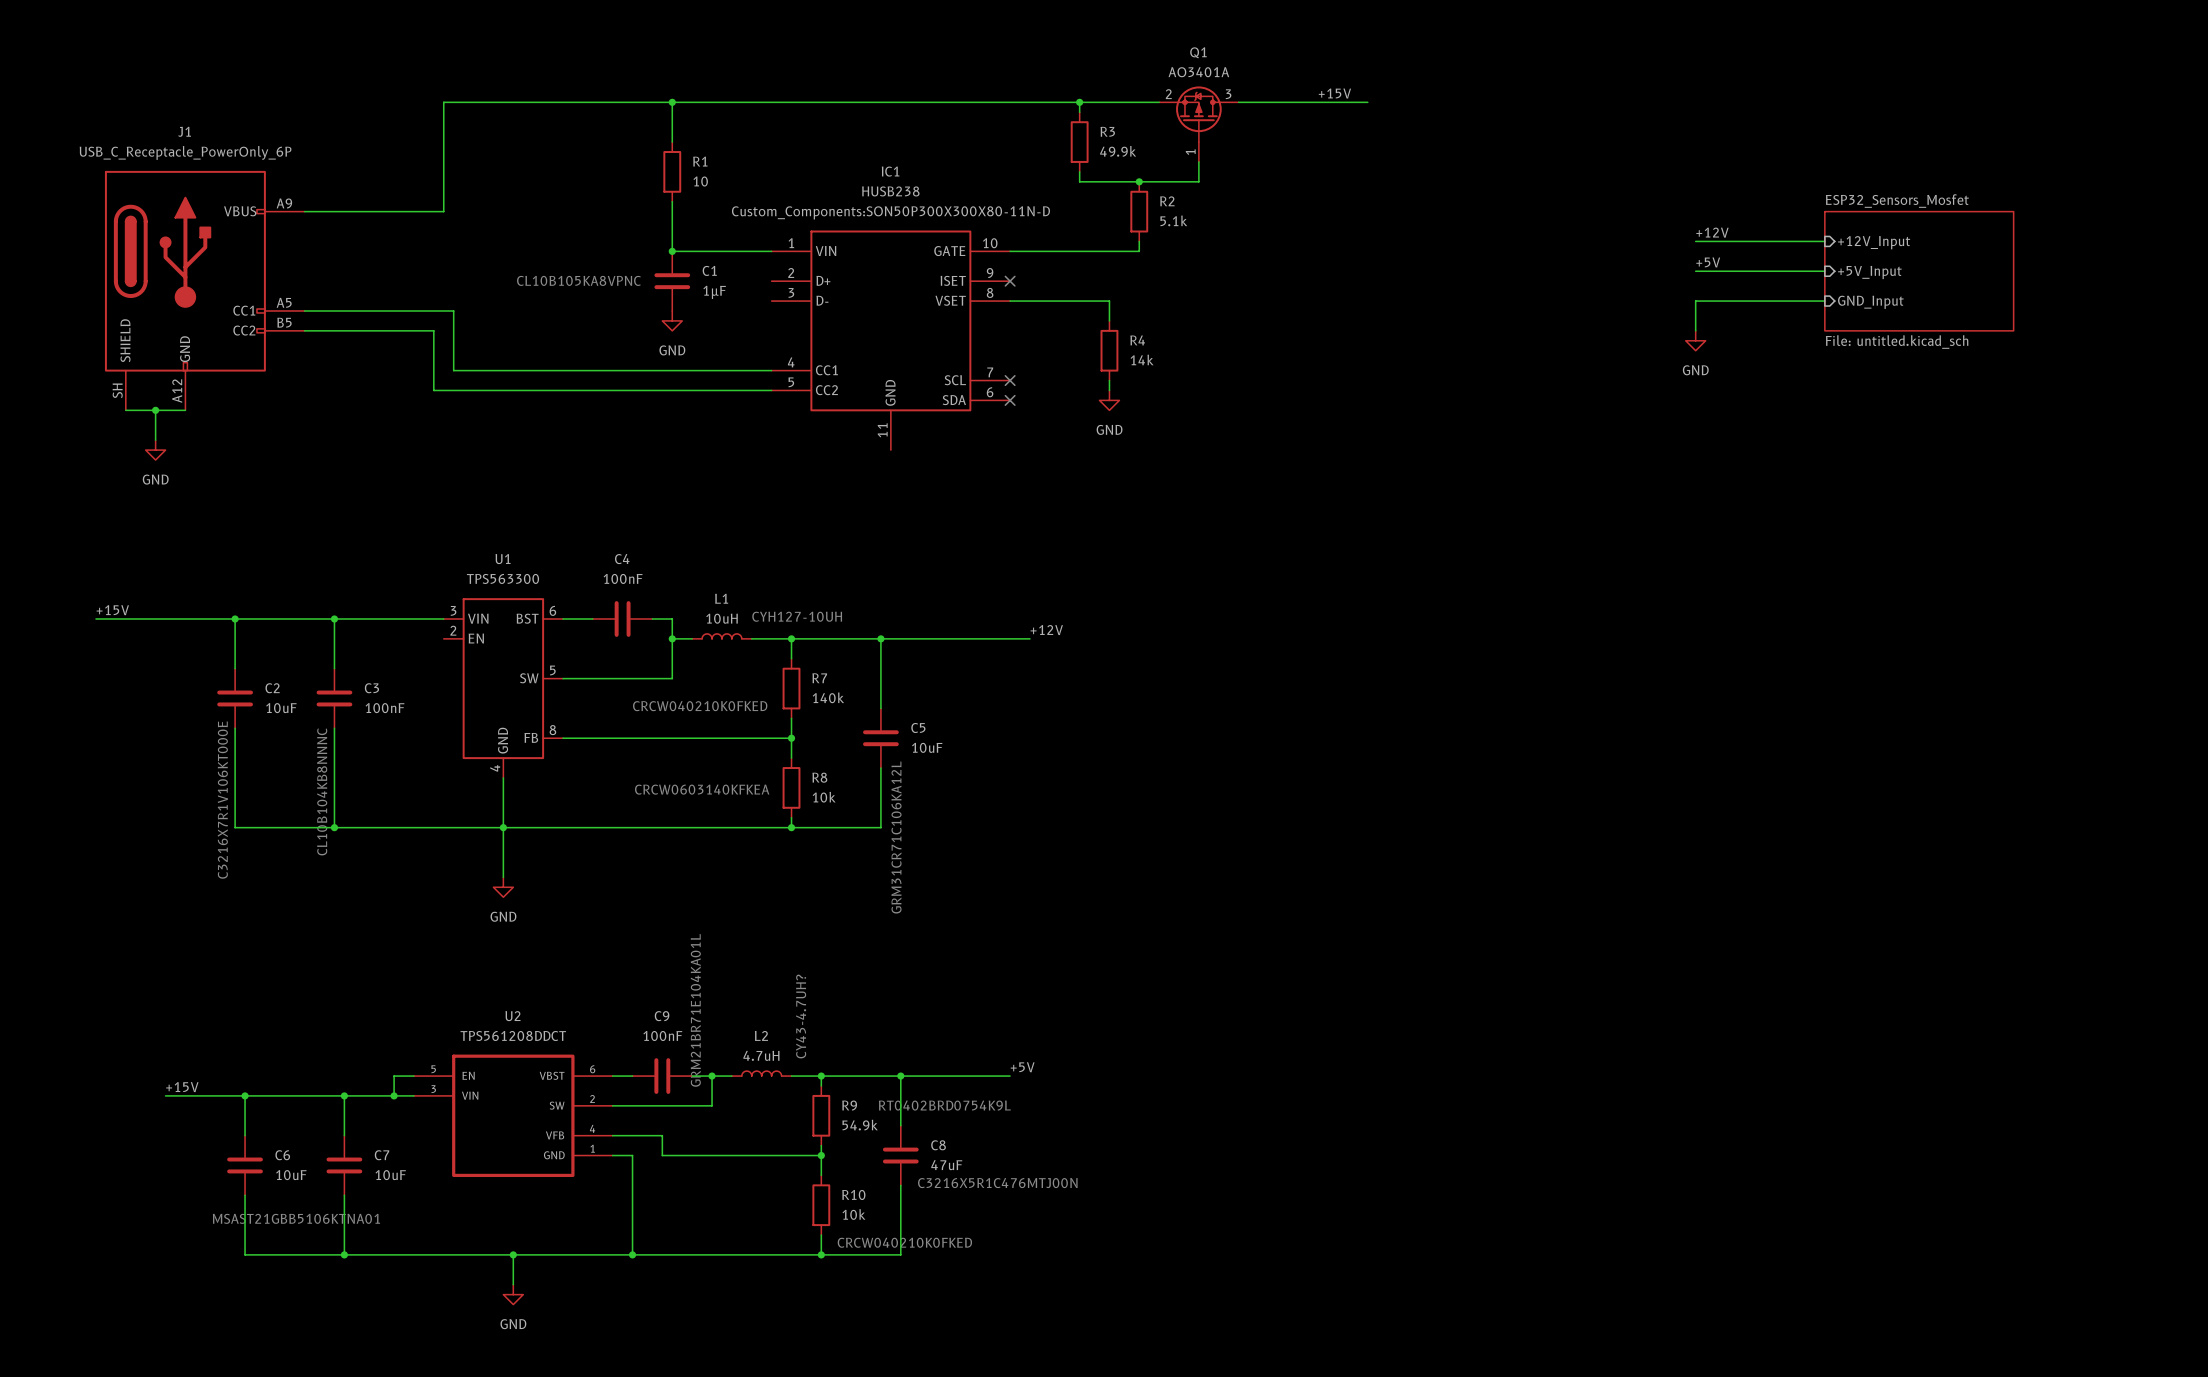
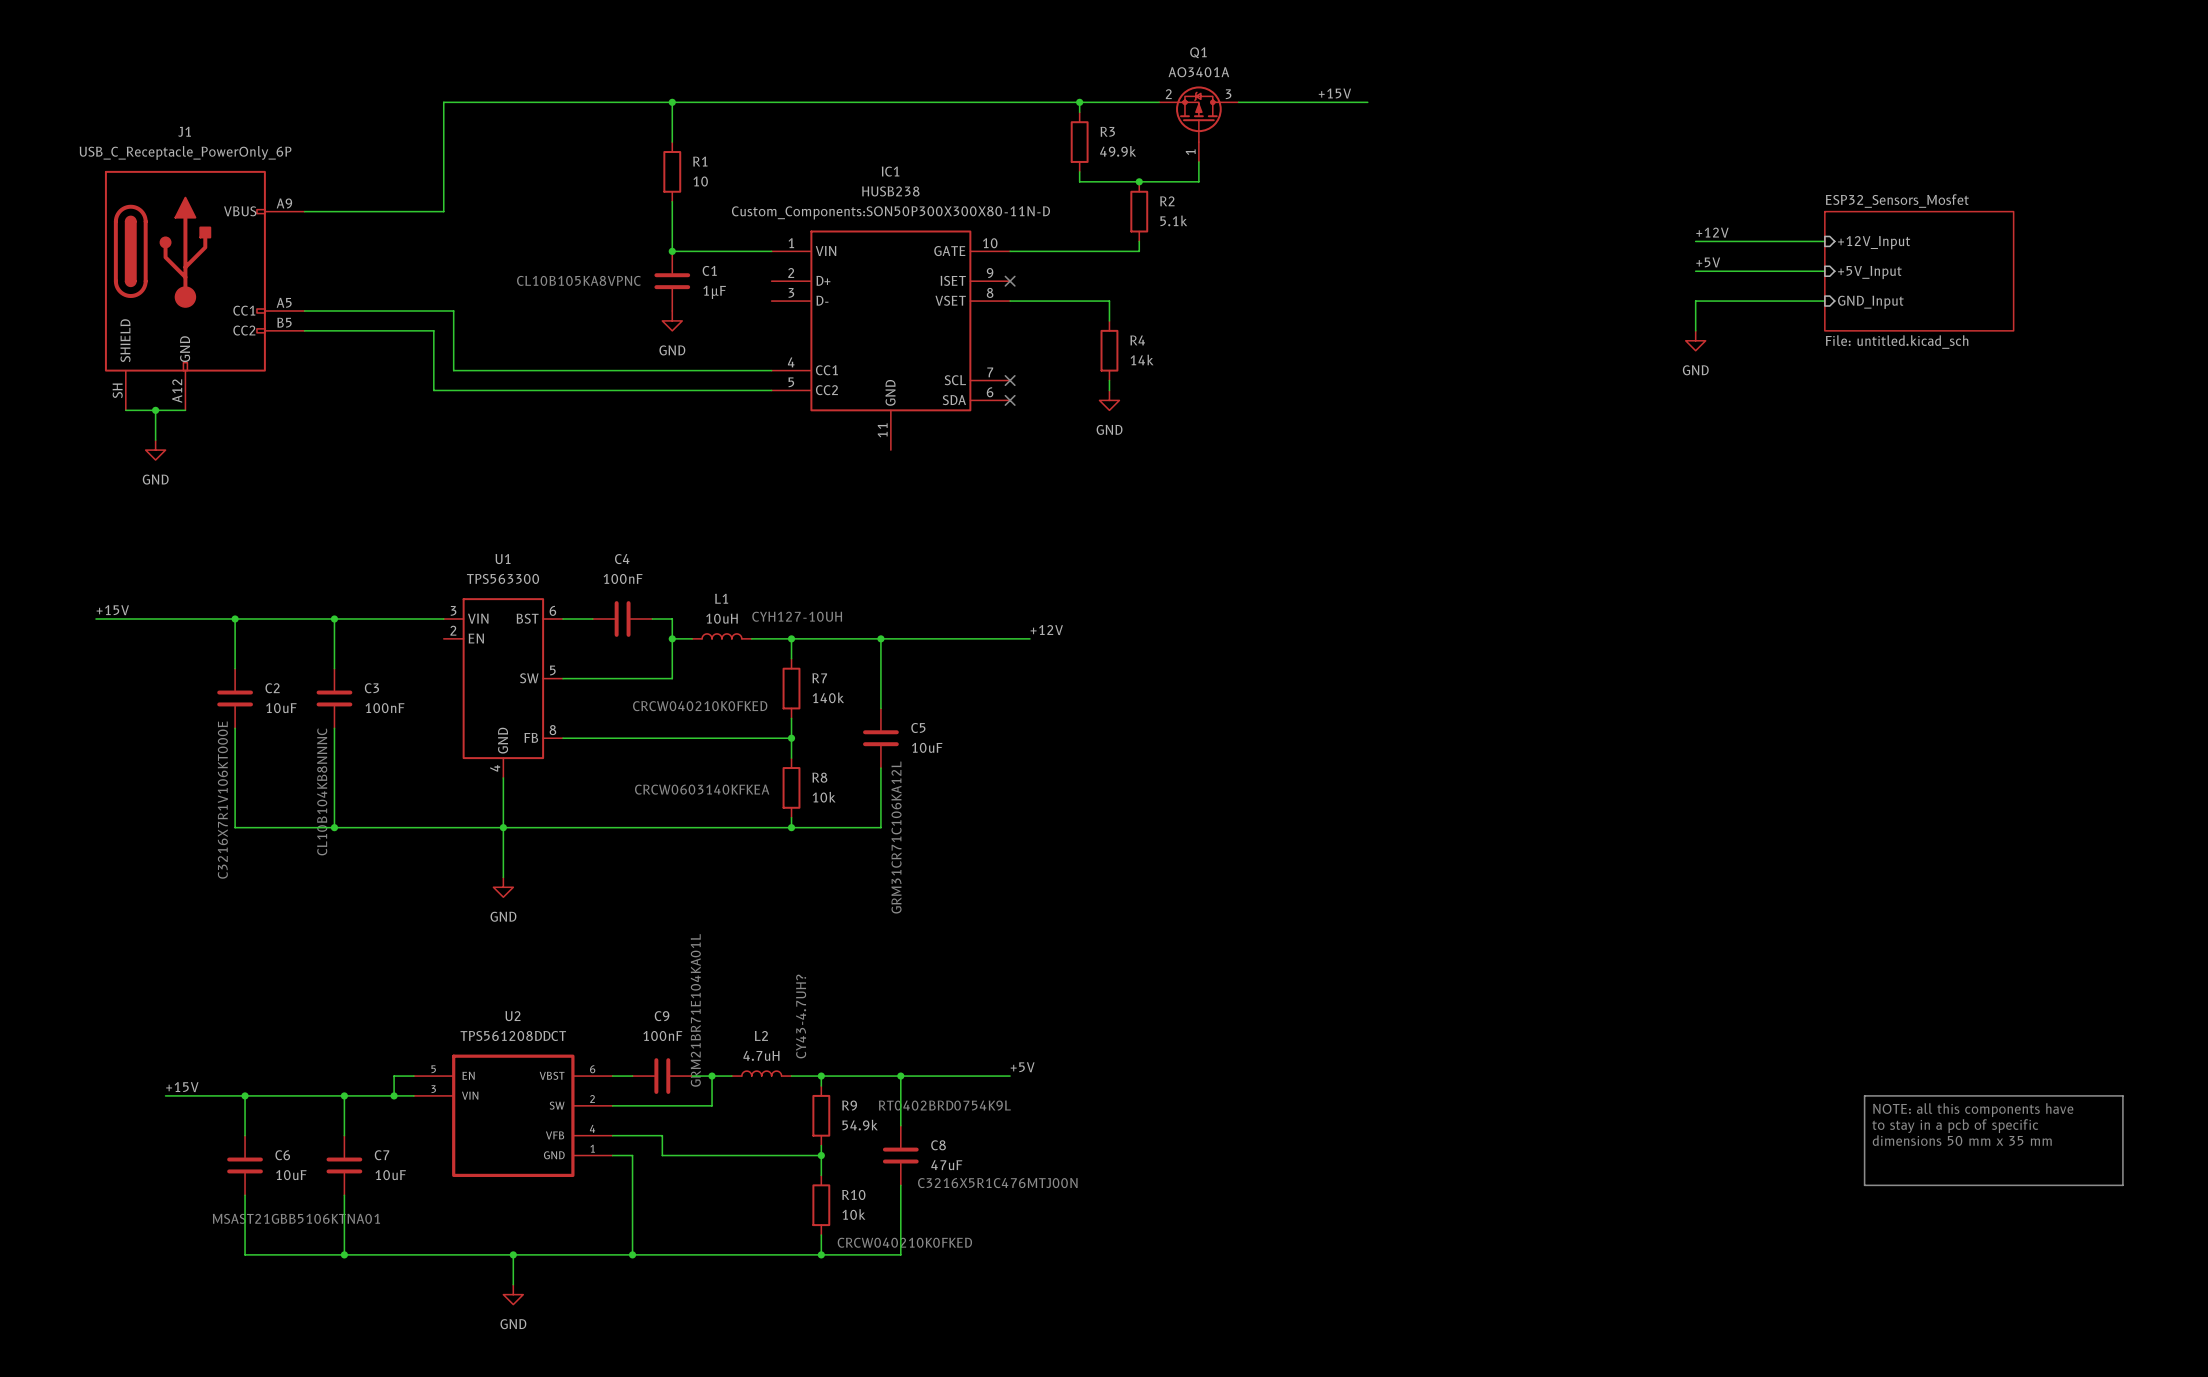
line: none -> (1864, 1095) (2122, 1095) (2122, 1185) (1864, 1185) (1864, 1095)
text: none -> NOTE: all this components have (1973, 1110)
text: none -> to stay in a pcb of specific (1955, 1126)
text: none -> dimensions 50 mm x 35 mm (1962, 1140)

